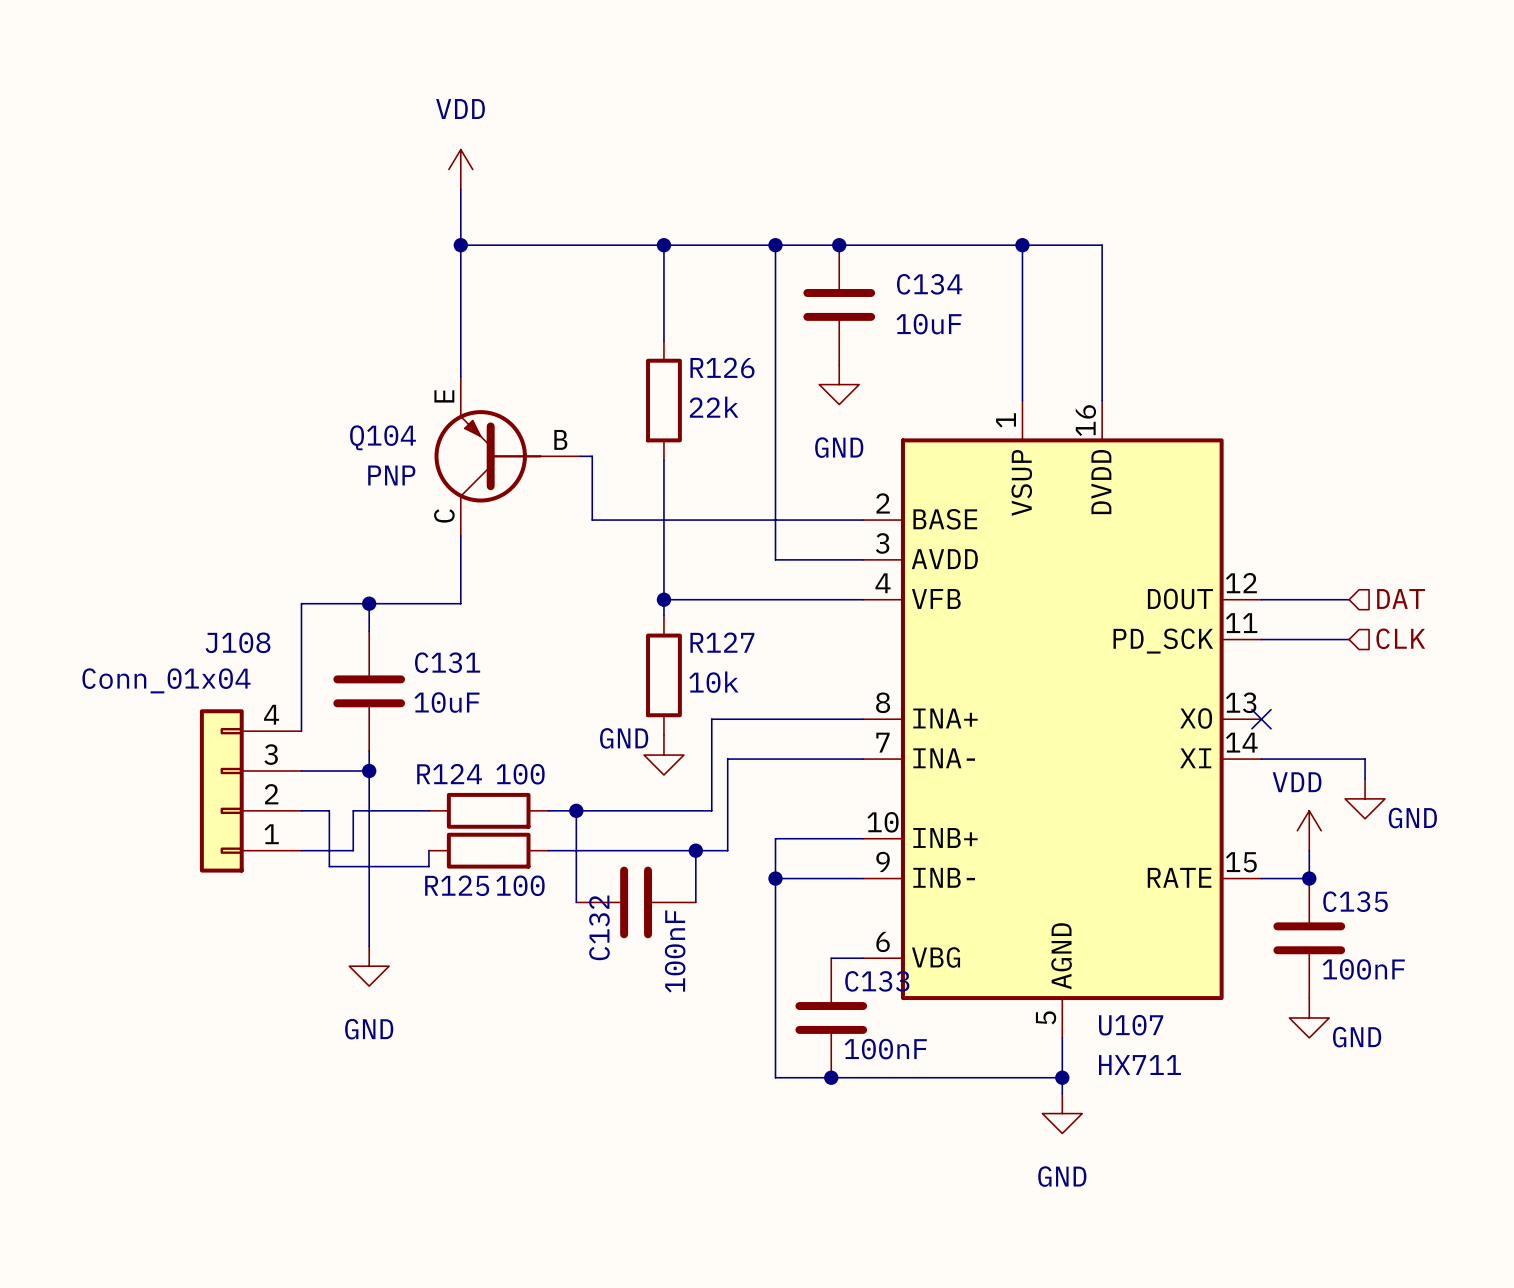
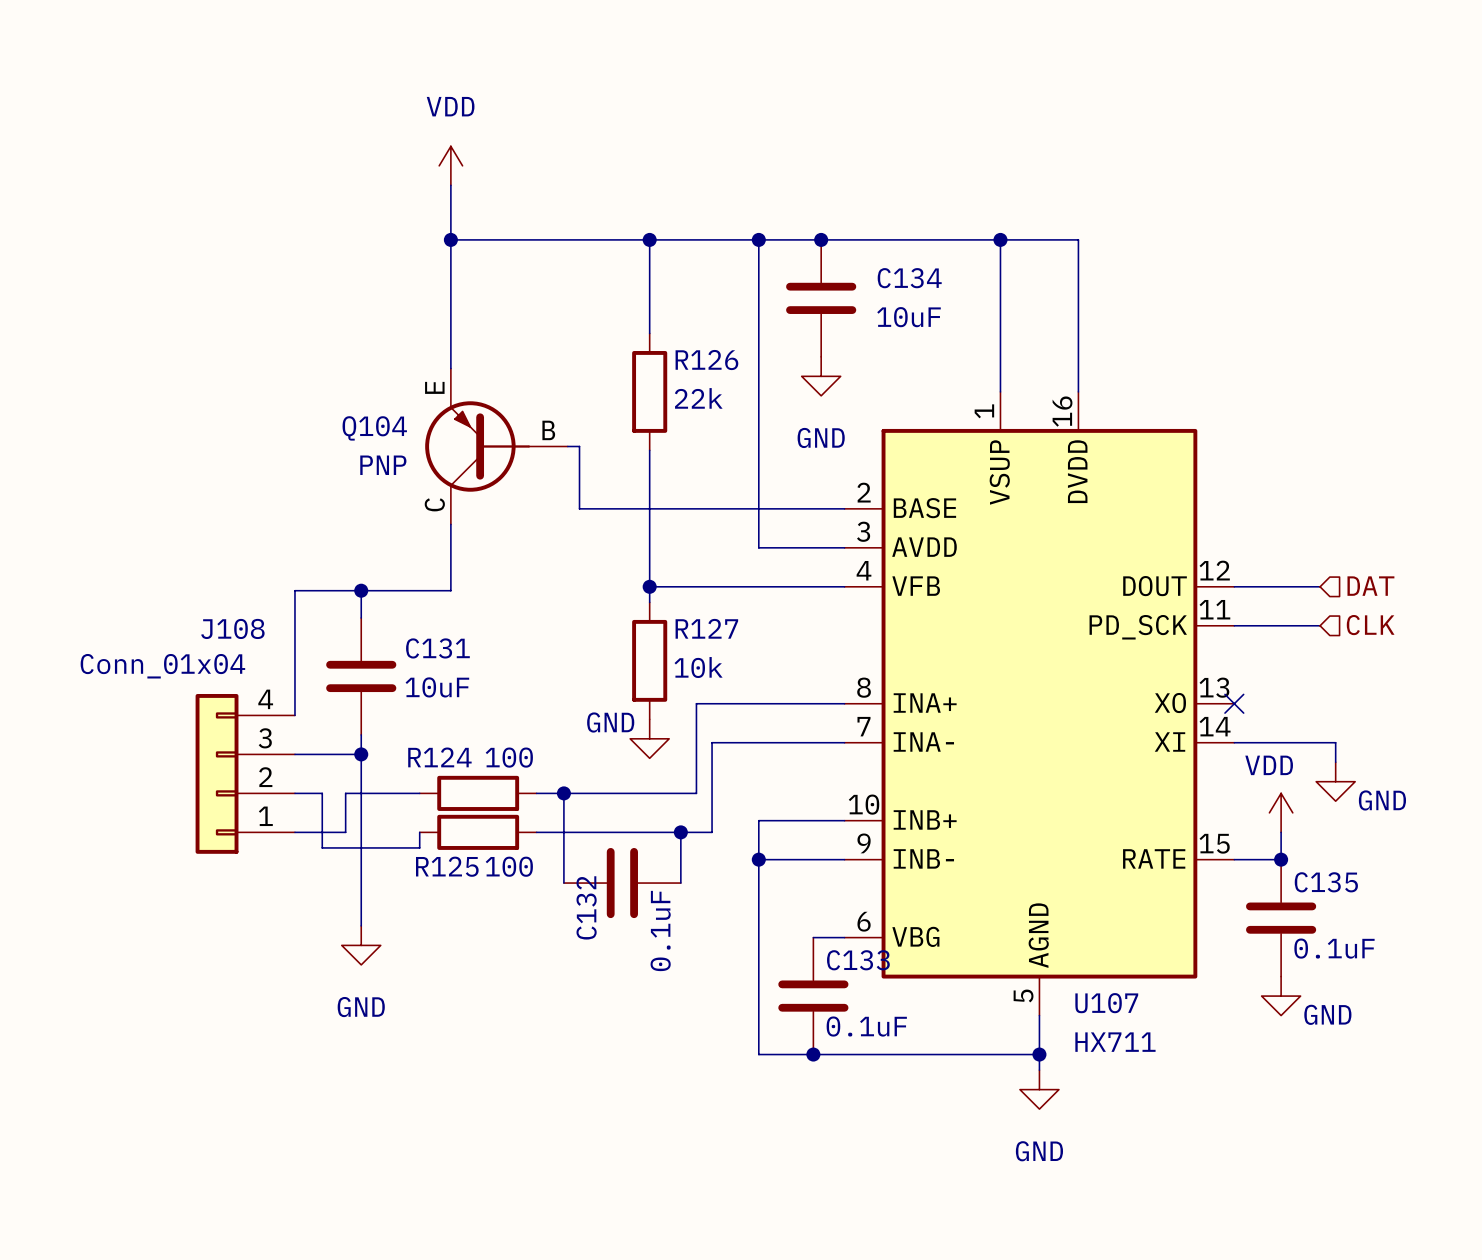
C132 value: 100nF (675, 951) -> 0.1uF (660, 931)
C135 value: 100nF (1363, 969) -> 0.1uF (1334, 948)
C133 value: 100nF (885, 1049) -> 0.1uF (866, 1026)

